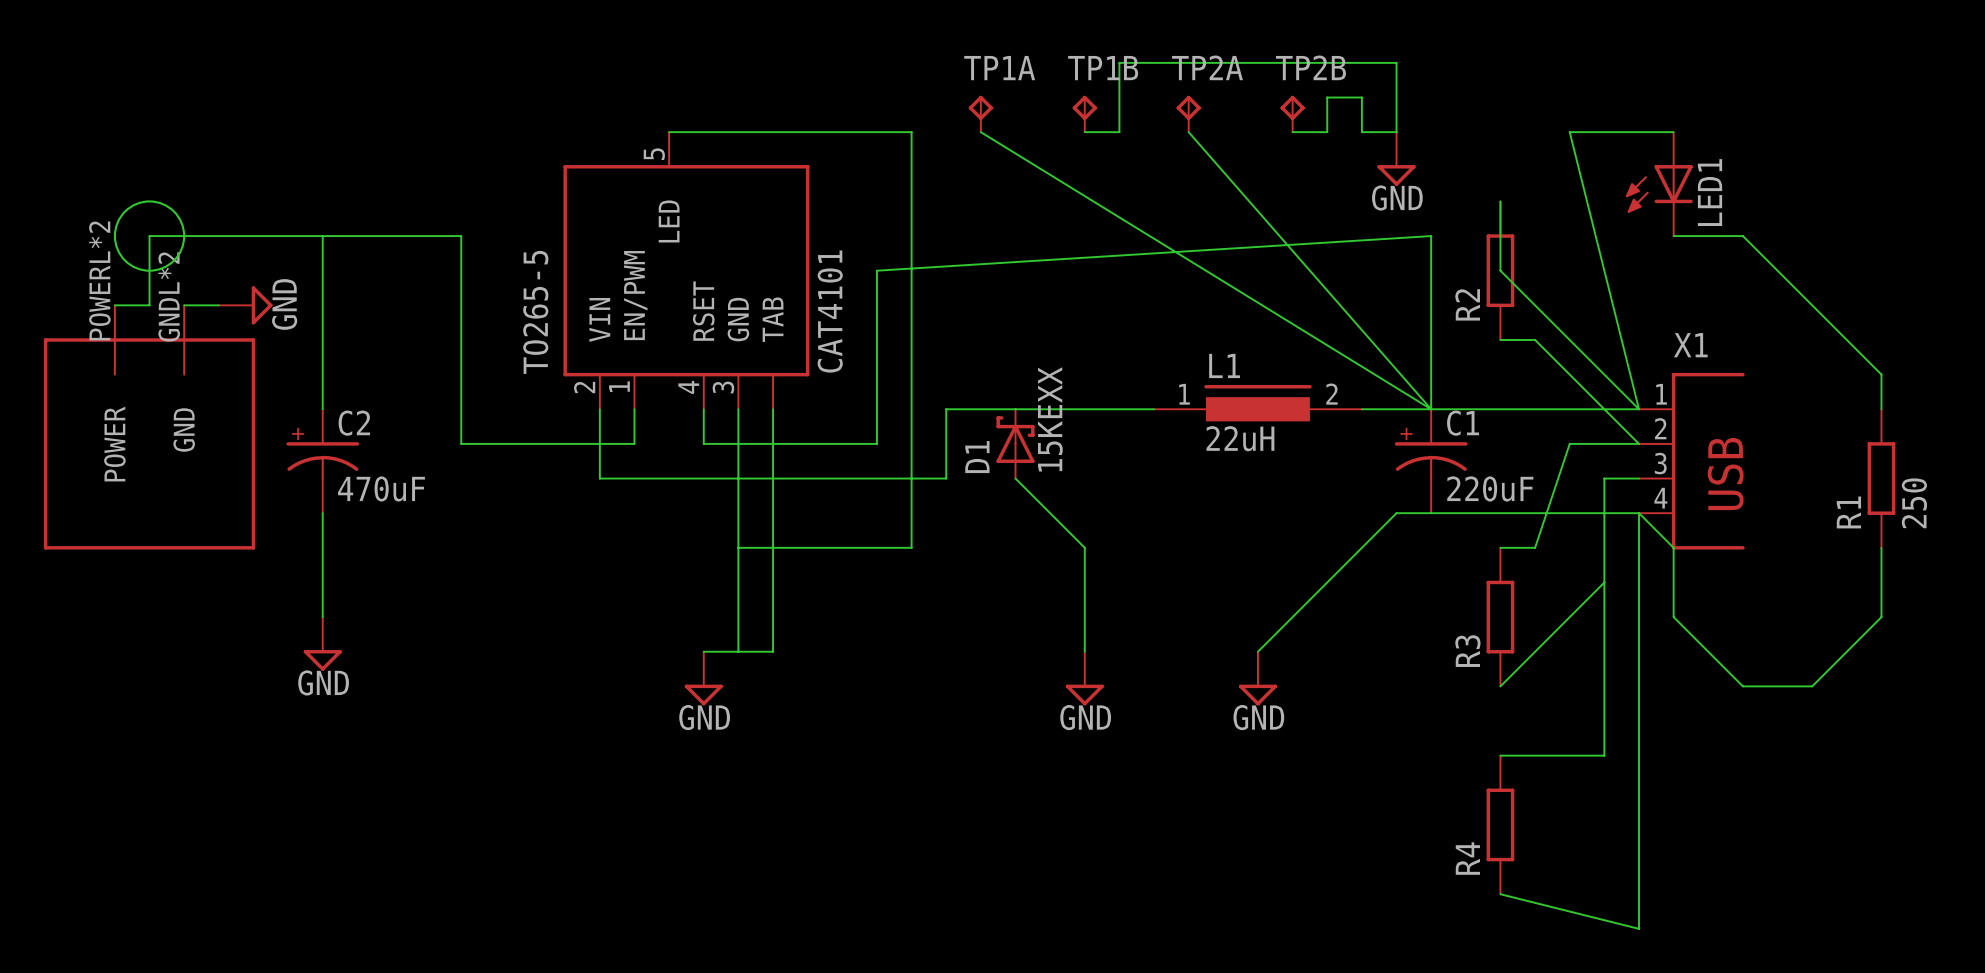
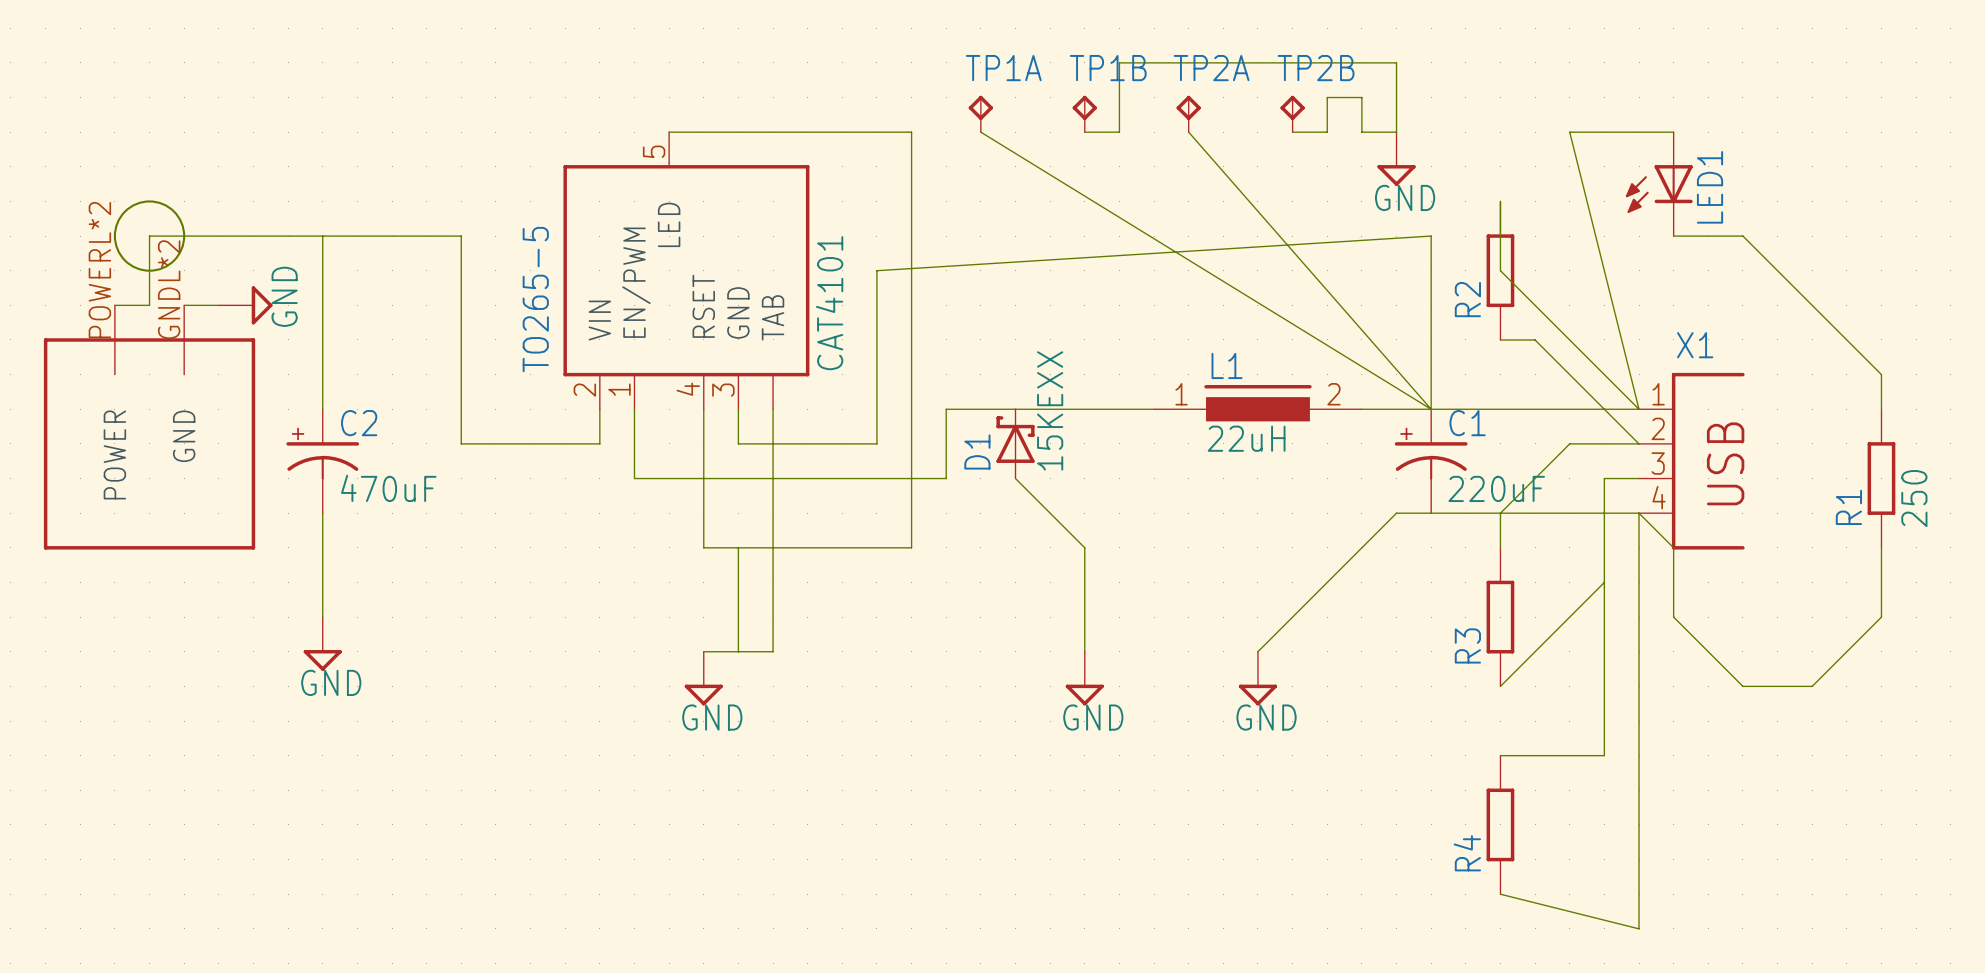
wire: (634, 443) (599, 443) (599, 478) (634, 478) -> (634, 443) (634, 478)
wire: (703, 443) (738, 443) (738, 547) -> (703, 443) (703, 547) (738, 547)
wire: (1569, 443) (1535, 547) (1500, 547) -> (1569, 443) (1500, 513) (1500, 547)

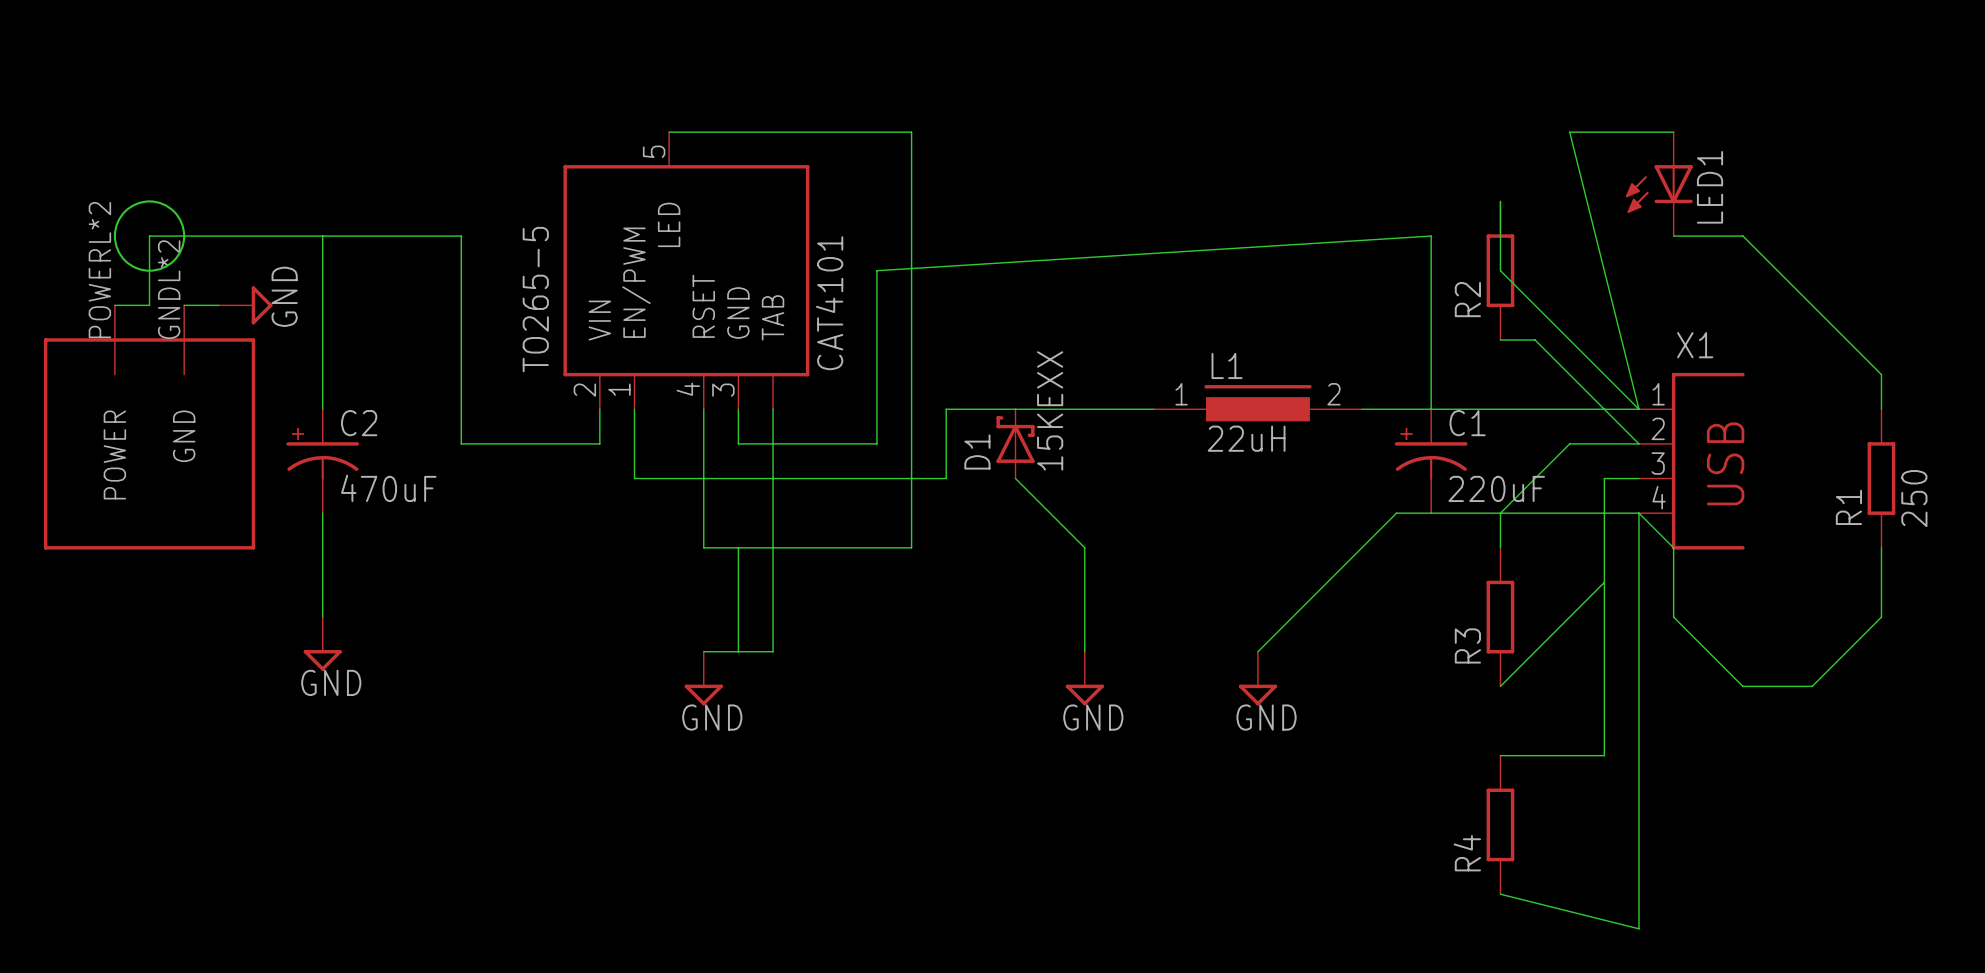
TP1A: (980, 113) -> none
TP1B: (1084, 113) -> none
TP2A: (1188, 113) -> none
TP2B: (1292, 113) -> none
wire: (980, 132) (1431, 409) (1188, 132) -> none
wire: (1084, 132) (1119, 132) (1119, 62) (1396, 62) (1396, 132) (1361, 132) (1361, 97) (1327, 97) (1327, 132) (1292, 132) -> none
power symbol: GND (1396, 159) -> none

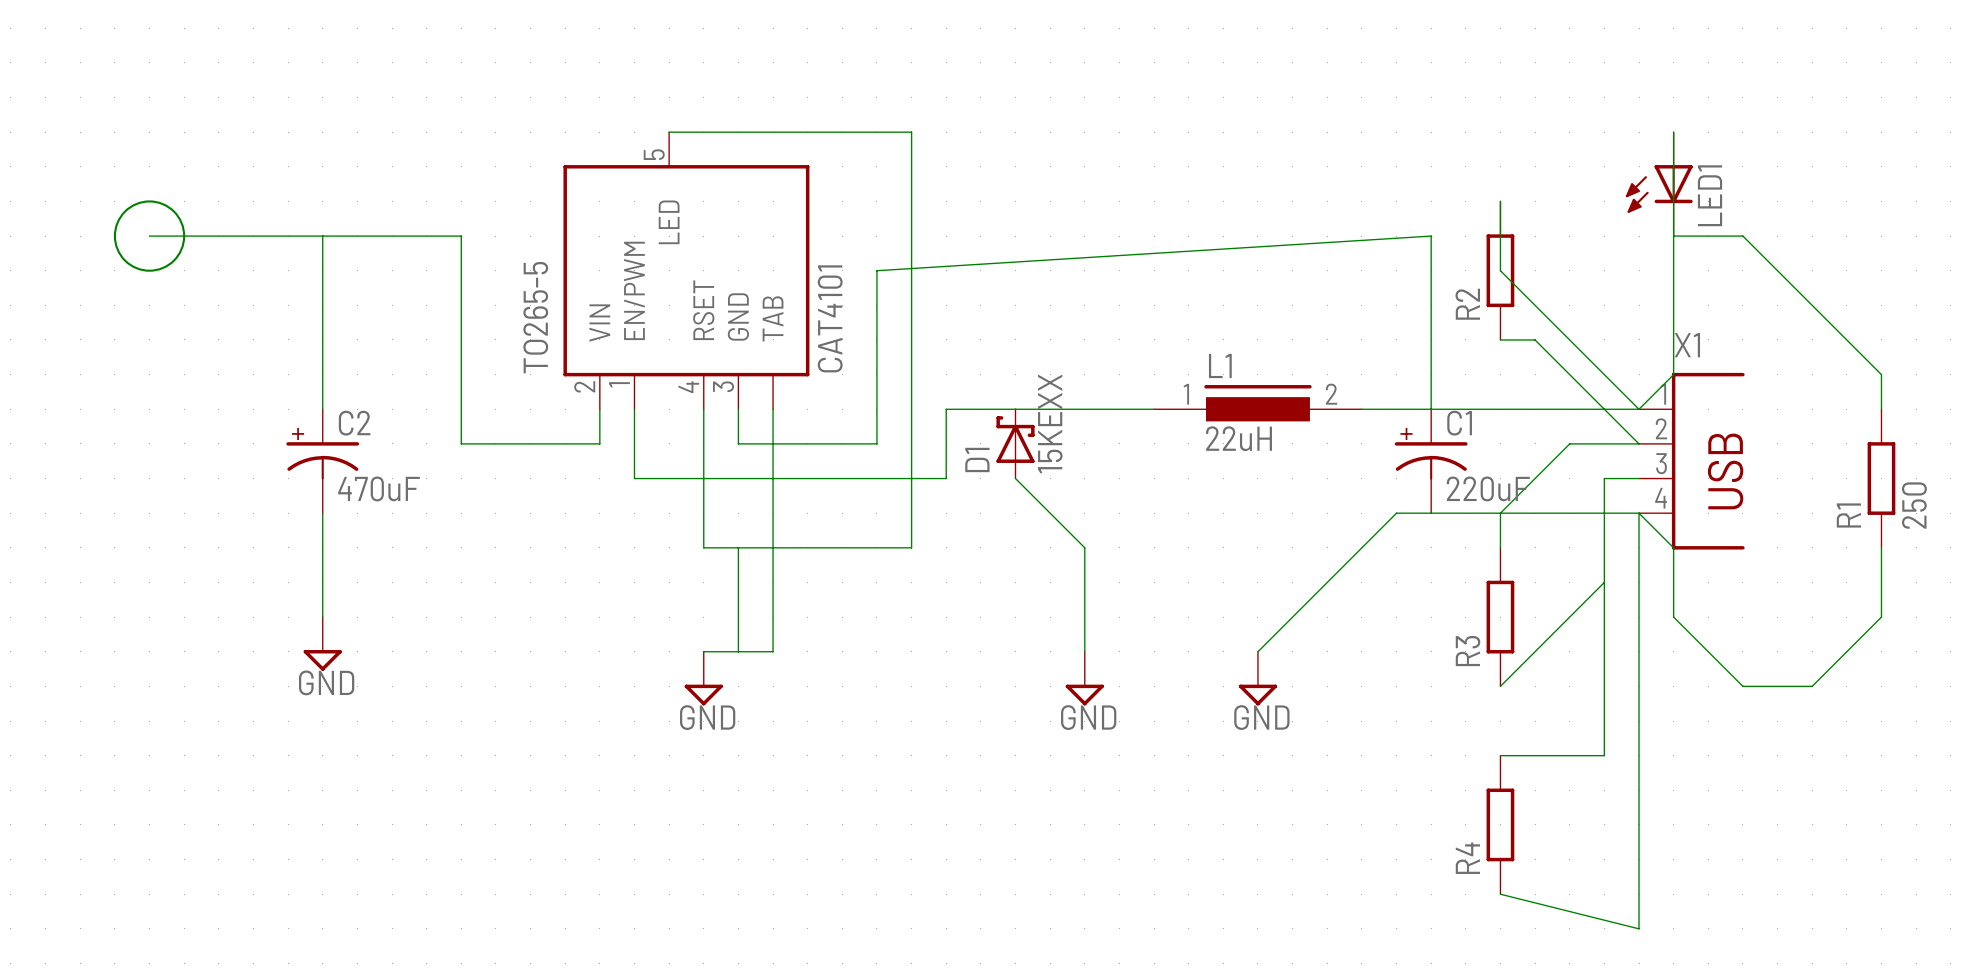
wire: (1673, 132) (1569, 132) (1639, 409) -> (1673, 132) (1673, 374) (1639, 409)
wire: (149, 236) (149, 305) (114, 305) -> none
wire: (184, 305) (218, 305) -> none
power symbol: GND (245, 305) -> none
part: (149, 427) -> none

